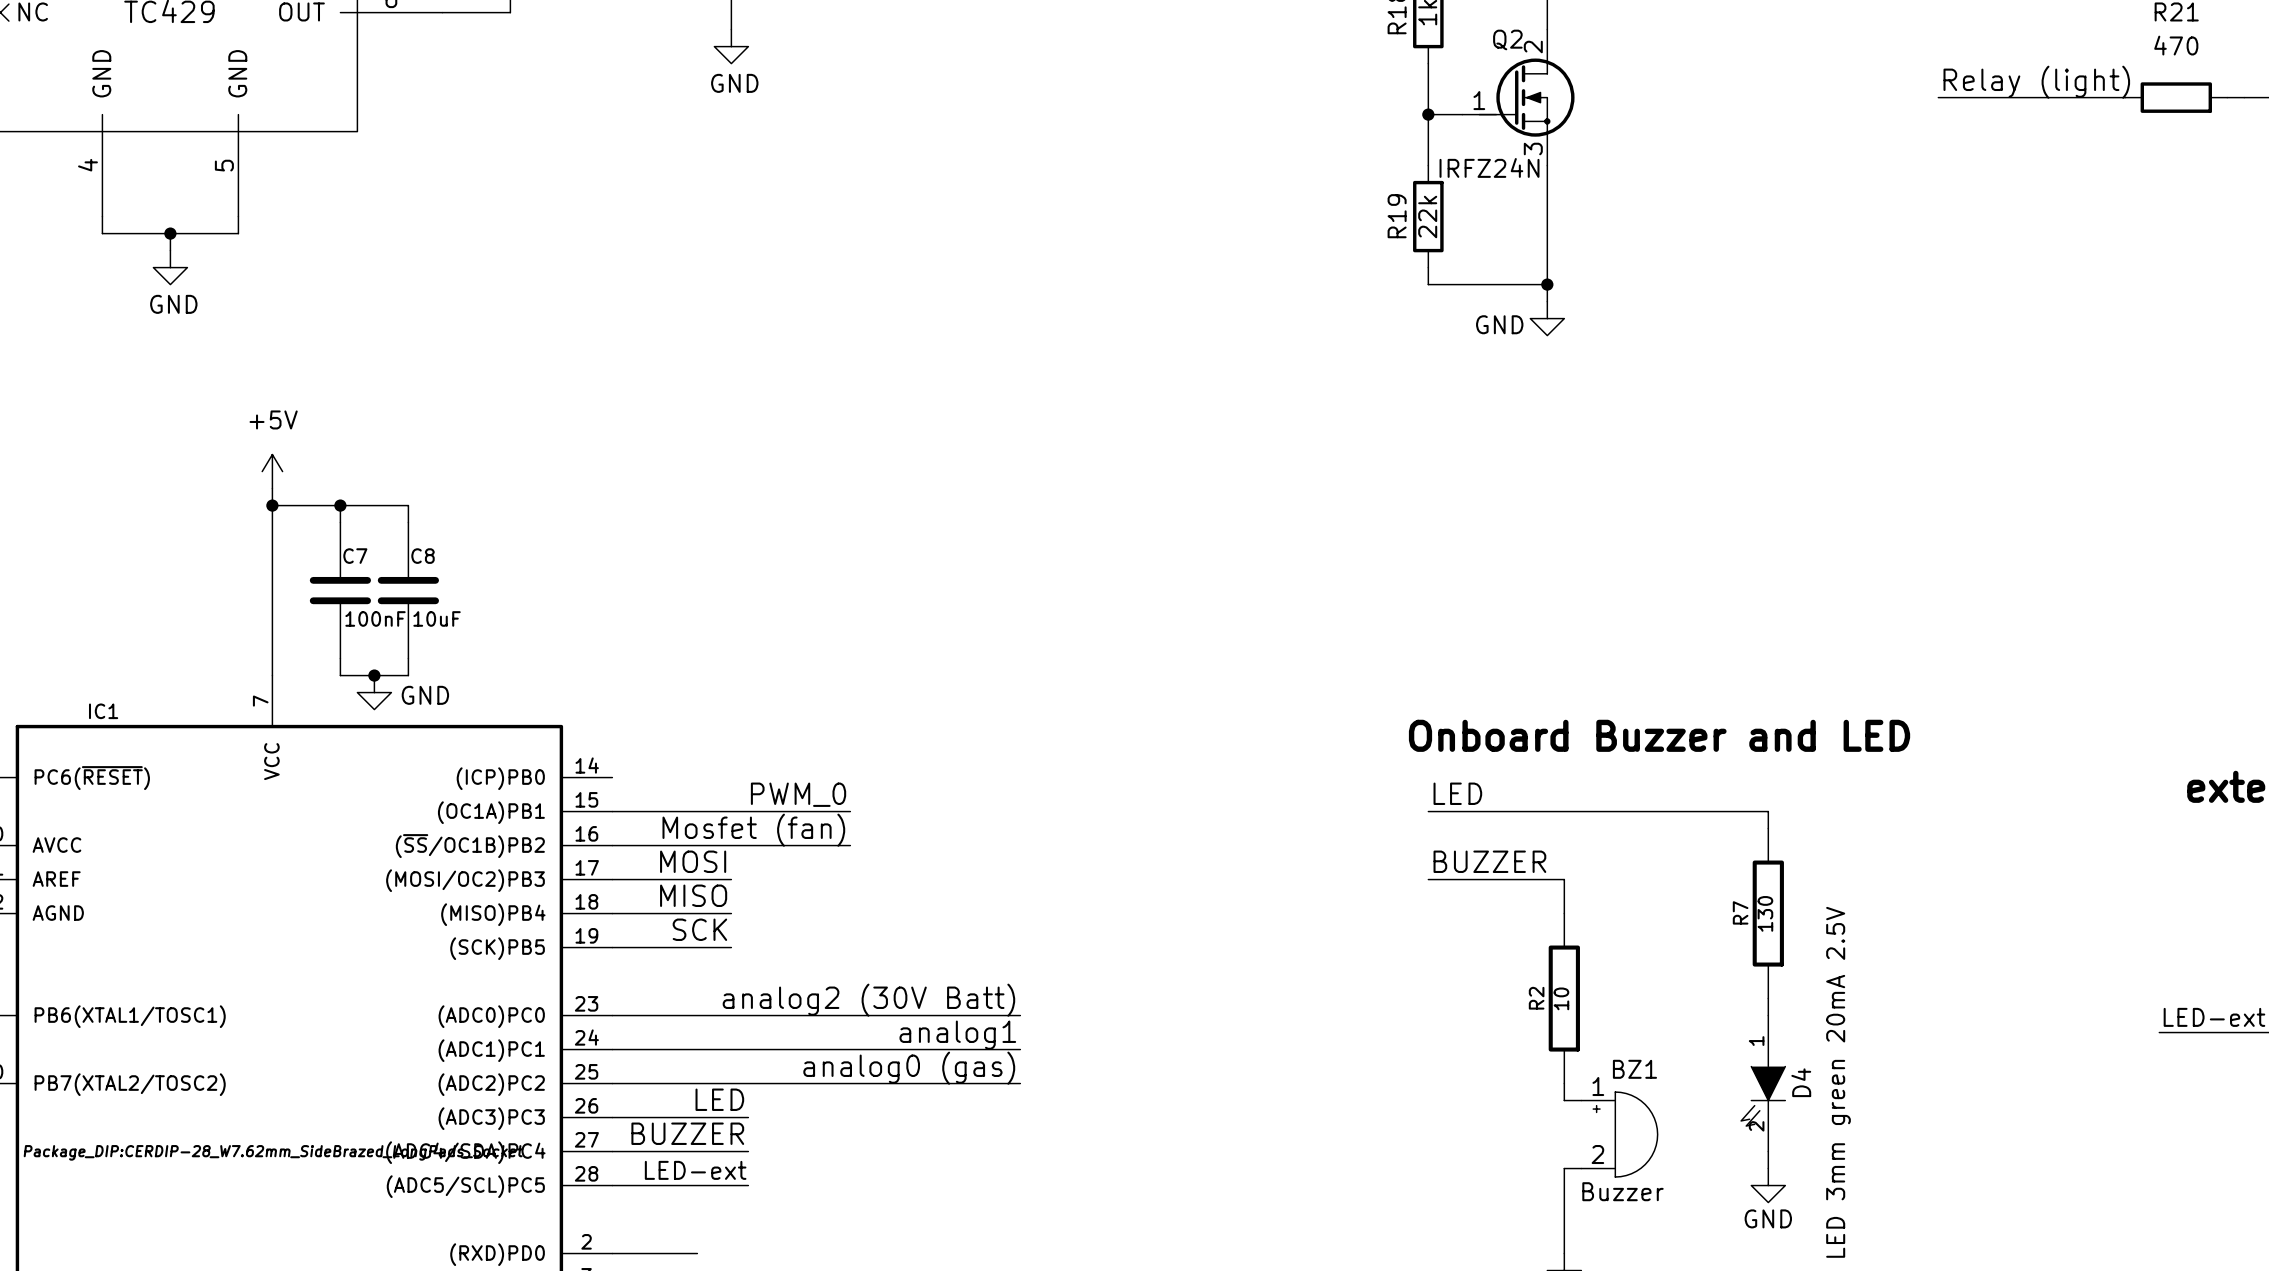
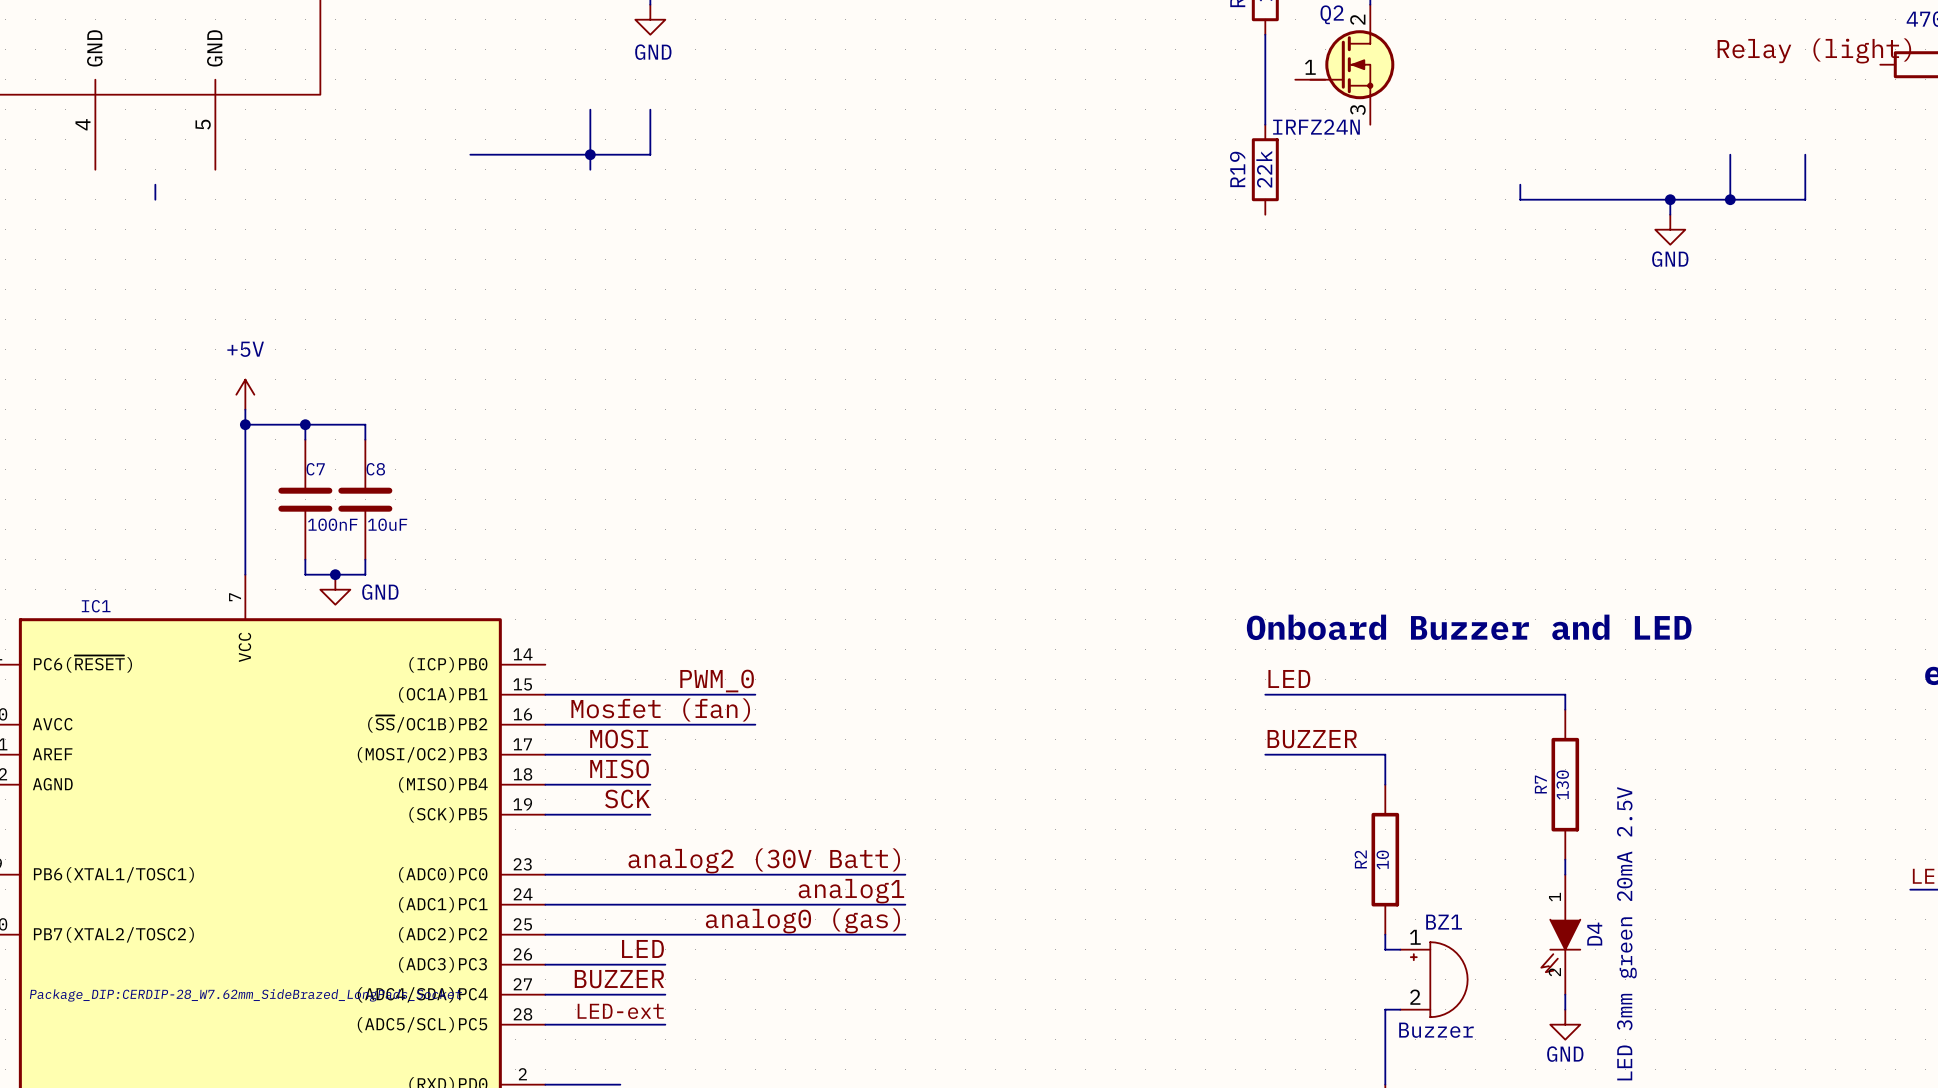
wire: (1938, 97) (2125, 97) -> none
wire: (1428, 114) (1462, 114) -> none
junction: (1428, 114) -> none
wire: none -> (590, 109) (590, 169)
wire: none -> (650, 109) (650, 154) (470, 154)
wire: (1547, 165) (1547, 301) -> none
junction: none -> (590, 154)
wire: none -> (1730, 154) (1730, 199)
wire: none -> (1805, 154) (1805, 199) (1520, 199) (1520, 184)
wire: (102, 216) (102, 233) (238, 233) (238, 216) -> none
junction: (170, 233) -> none
wire: none -> (1670, 199) (1670, 214)
junction: none -> (1670, 199)
junction: none -> (1730, 199)
power symbol: GND (170, 267) -> none
wire: (1428, 267) (1428, 284) (1547, 284) -> none
junction: (1547, 284) -> none
power symbol: none -> GND (1670, 229)
power symbol: GND (1547, 318) -> none

